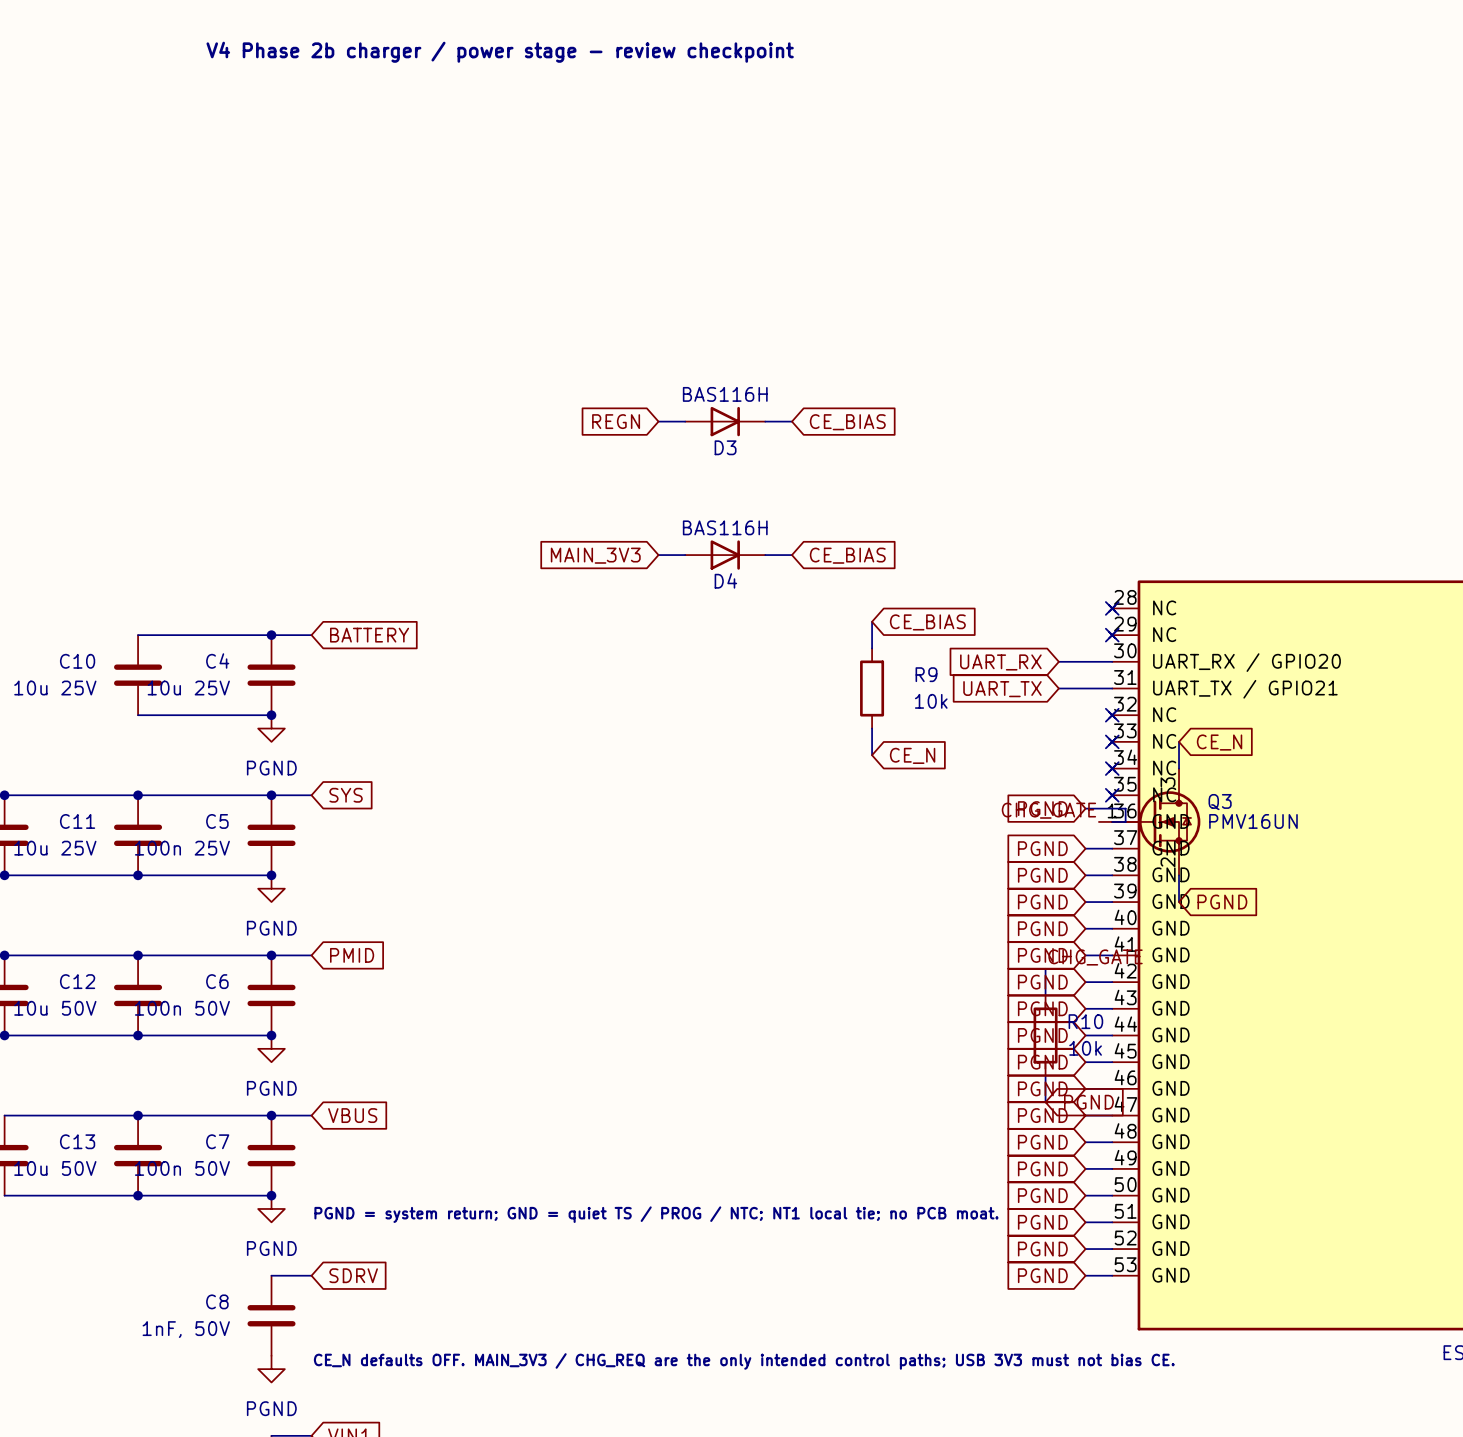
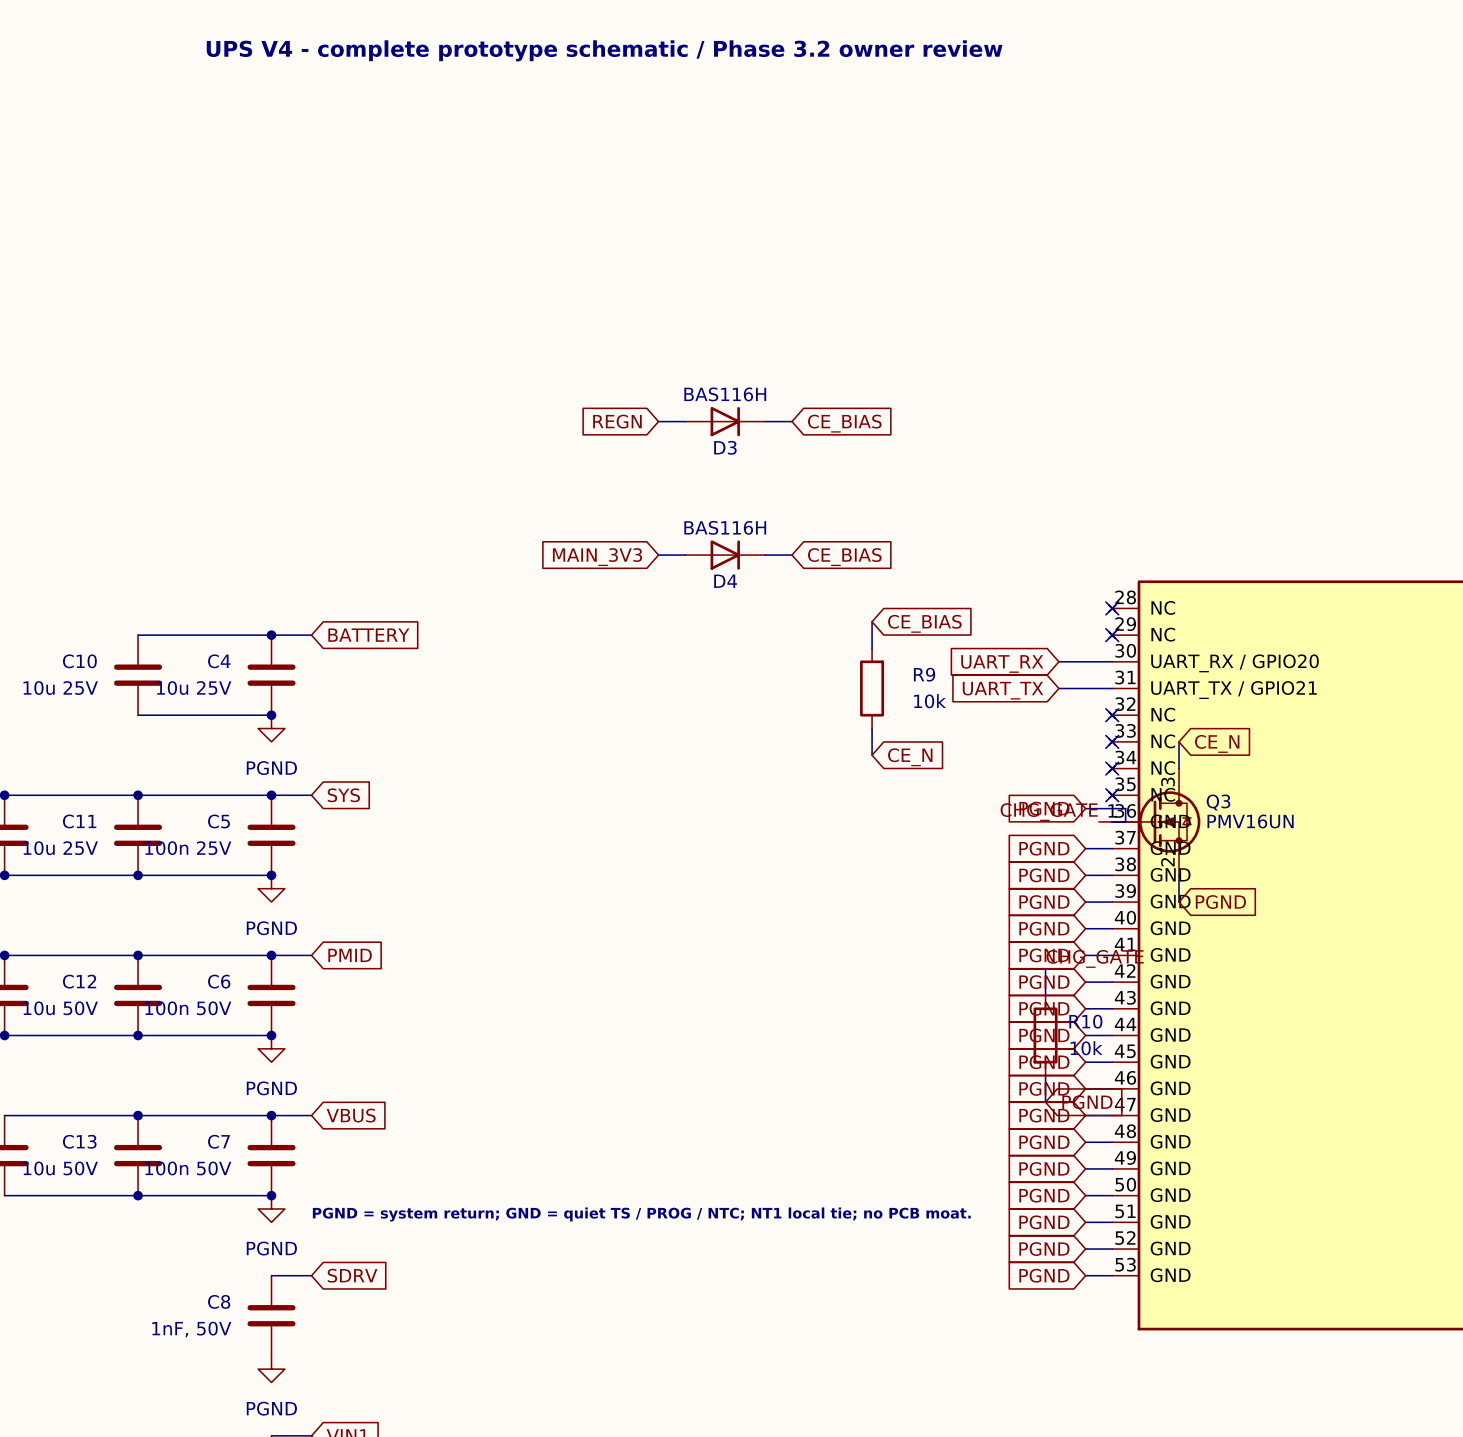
text: V4 Phase 2b charger / power stage - review checkpoint (500, 52) -> UPS V4 - complete prototype schematic / Phase 3.2 owner review (604, 50)
text: CE_N defaults OFF. MAIN_3V3 / CHG_REQ are the only intended control paths; USB 3V3 must not bias CE. (744, 1361) -> none

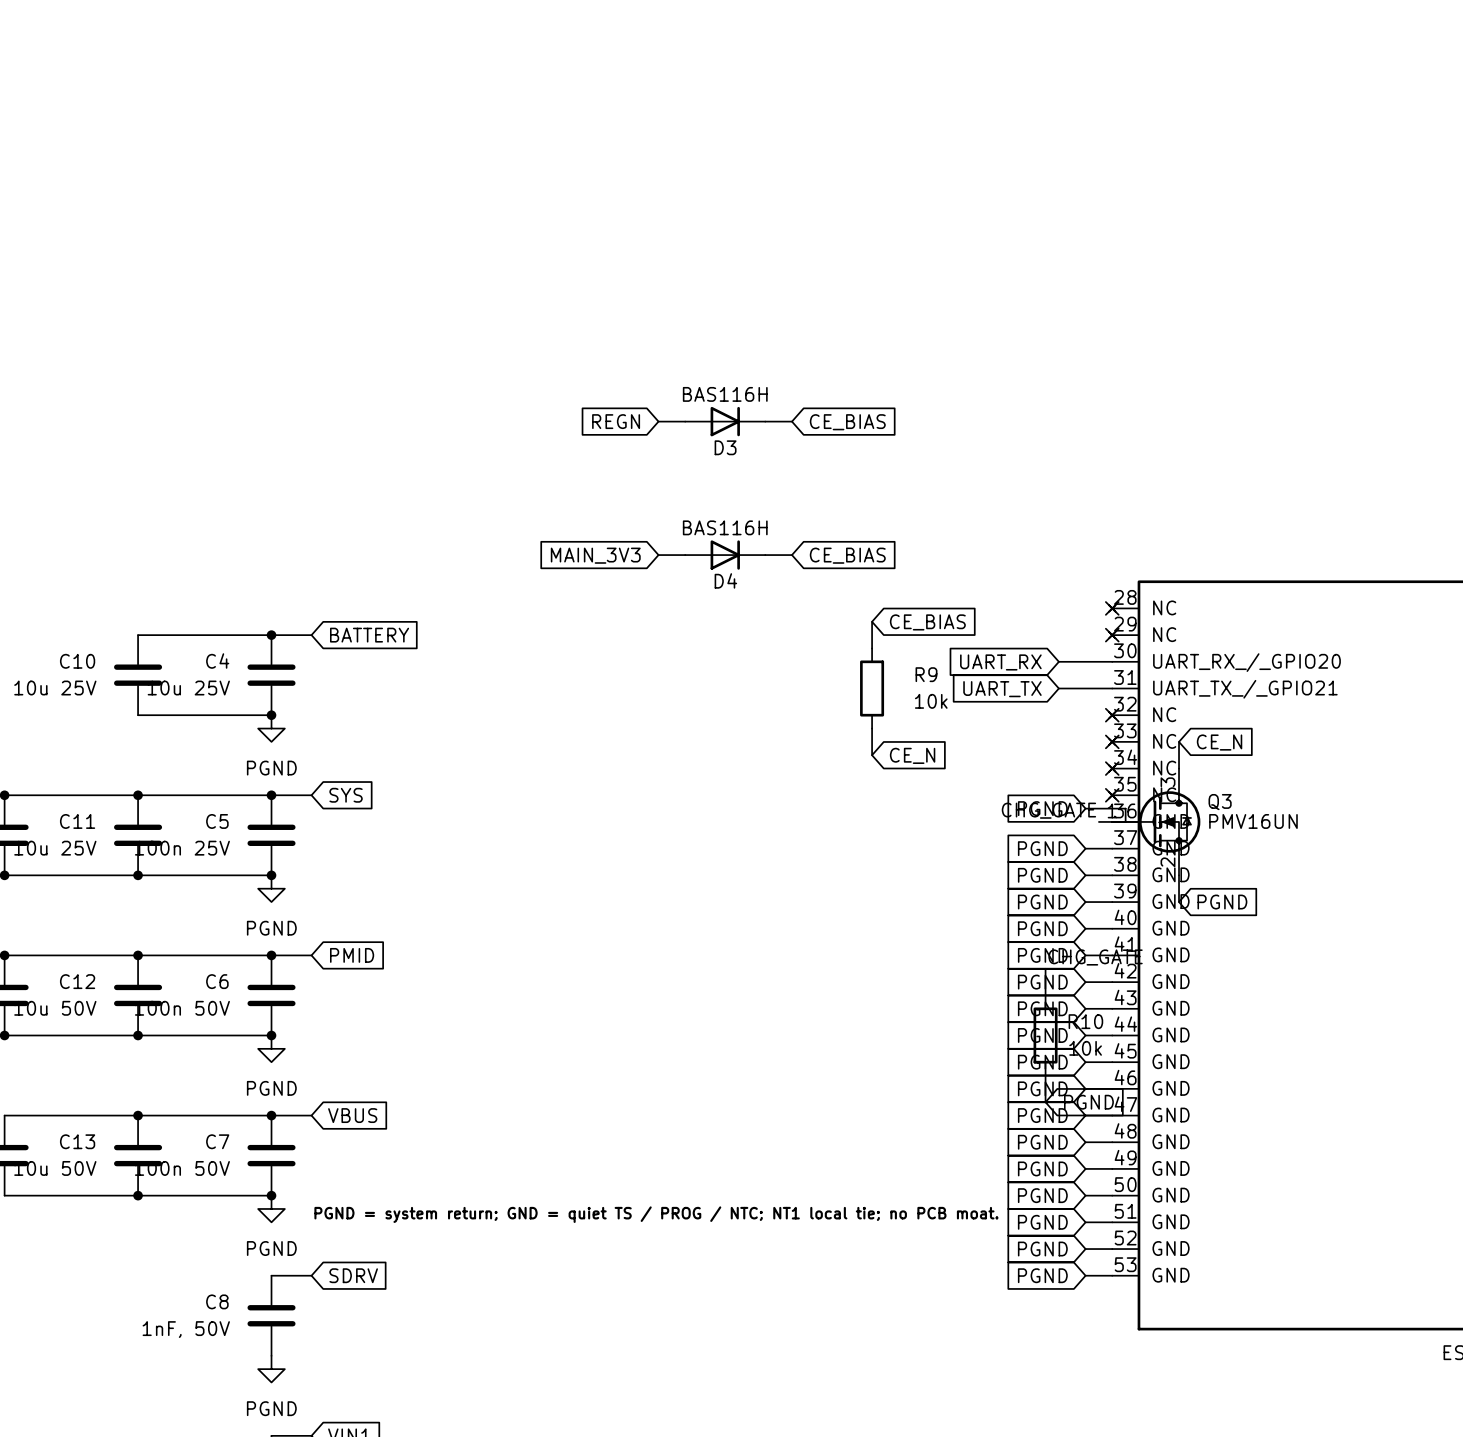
text: UPS V4 - complete prototype schematic / Phase 3.2 owner review (604, 50) -> none
part pin name: UART_RX / GPIO20 (1235, 663) -> UART_RX_/_GPIO20 (1246, 662)
part pin name: UART_TX / GPIO21 (1234, 690) -> UART_TX_/_GPIO21 (1245, 689)

